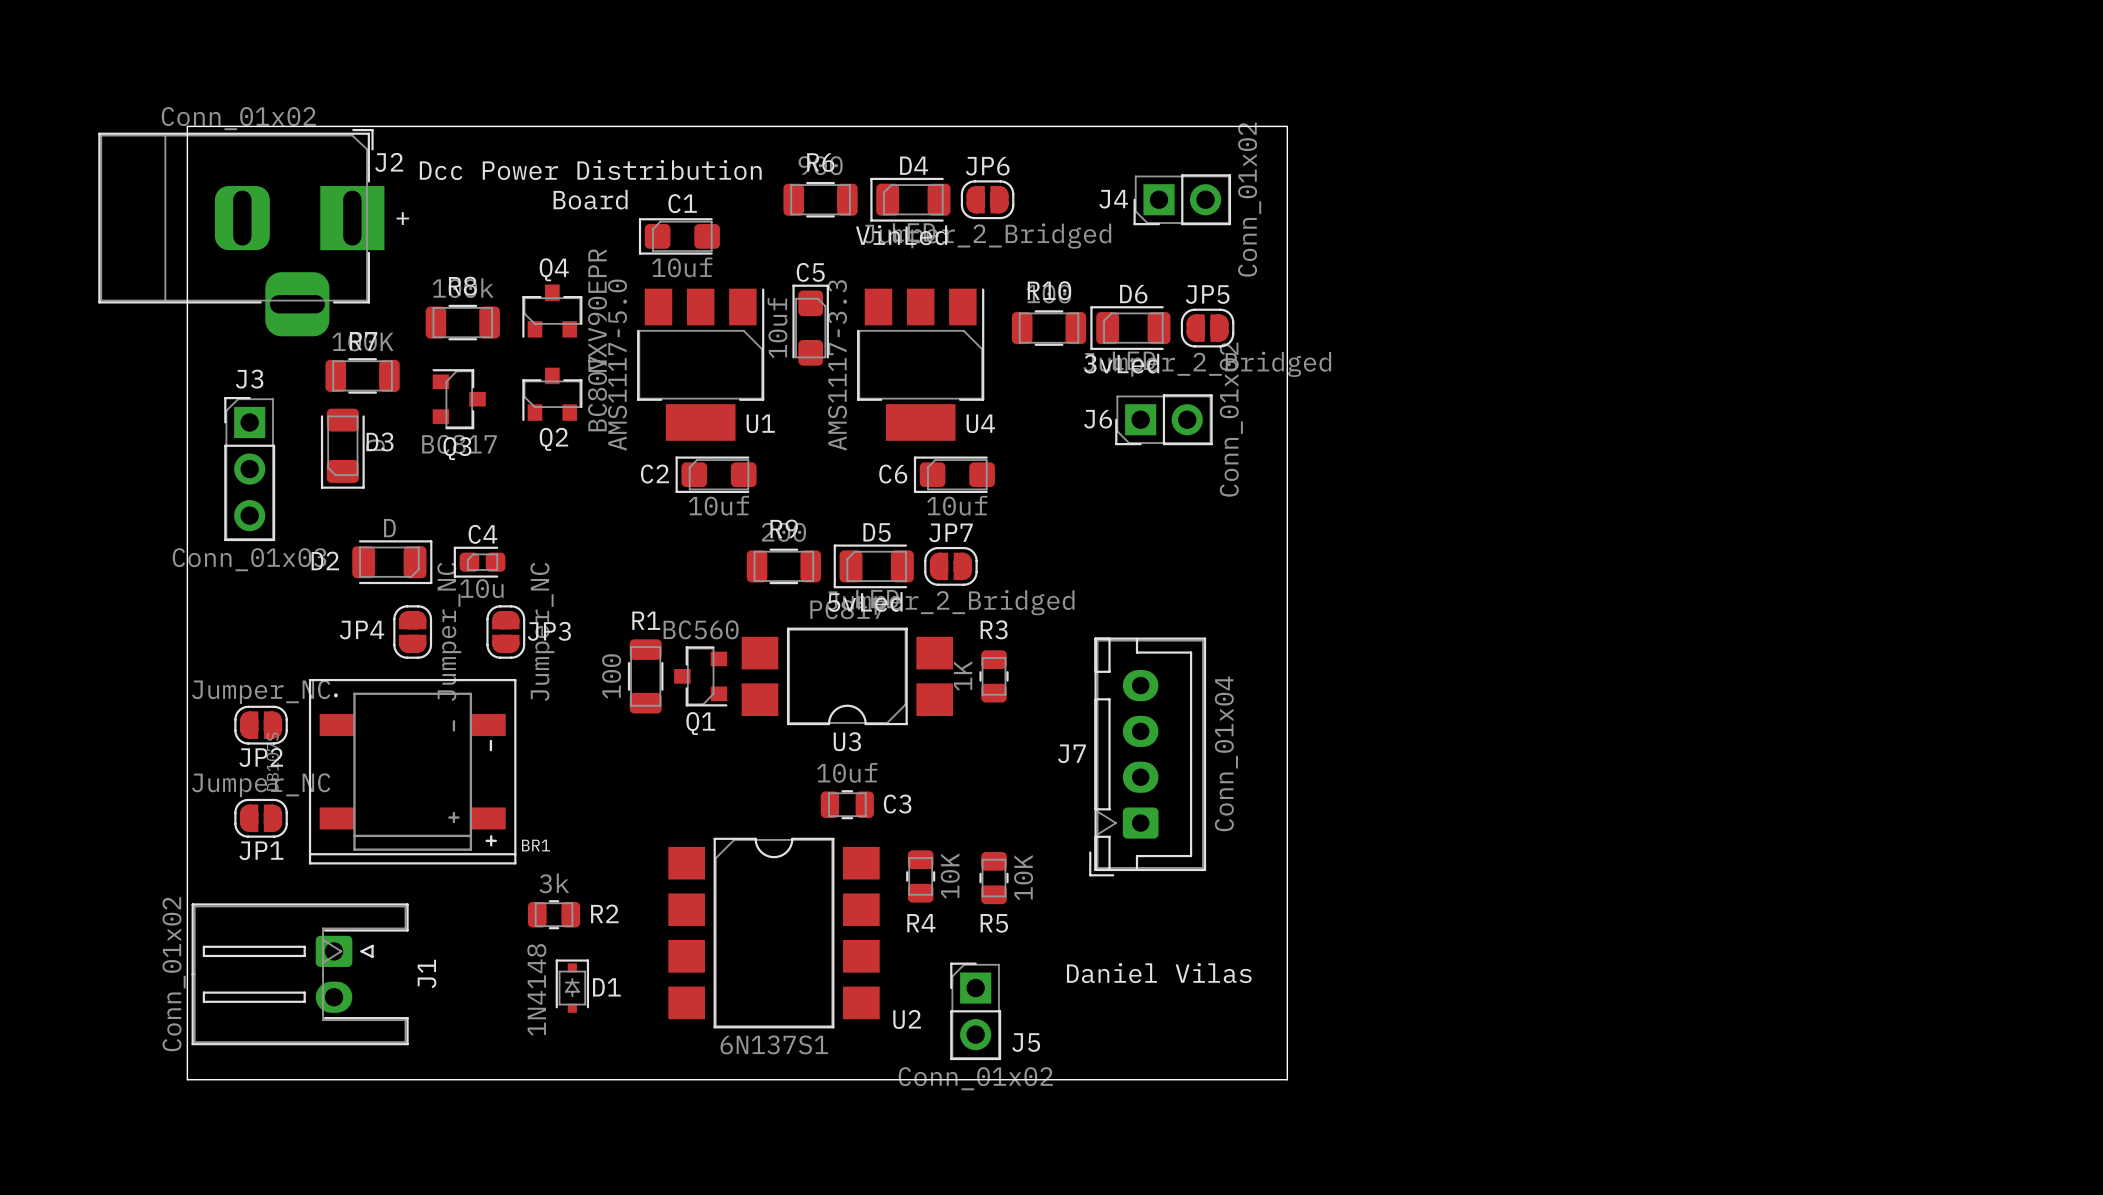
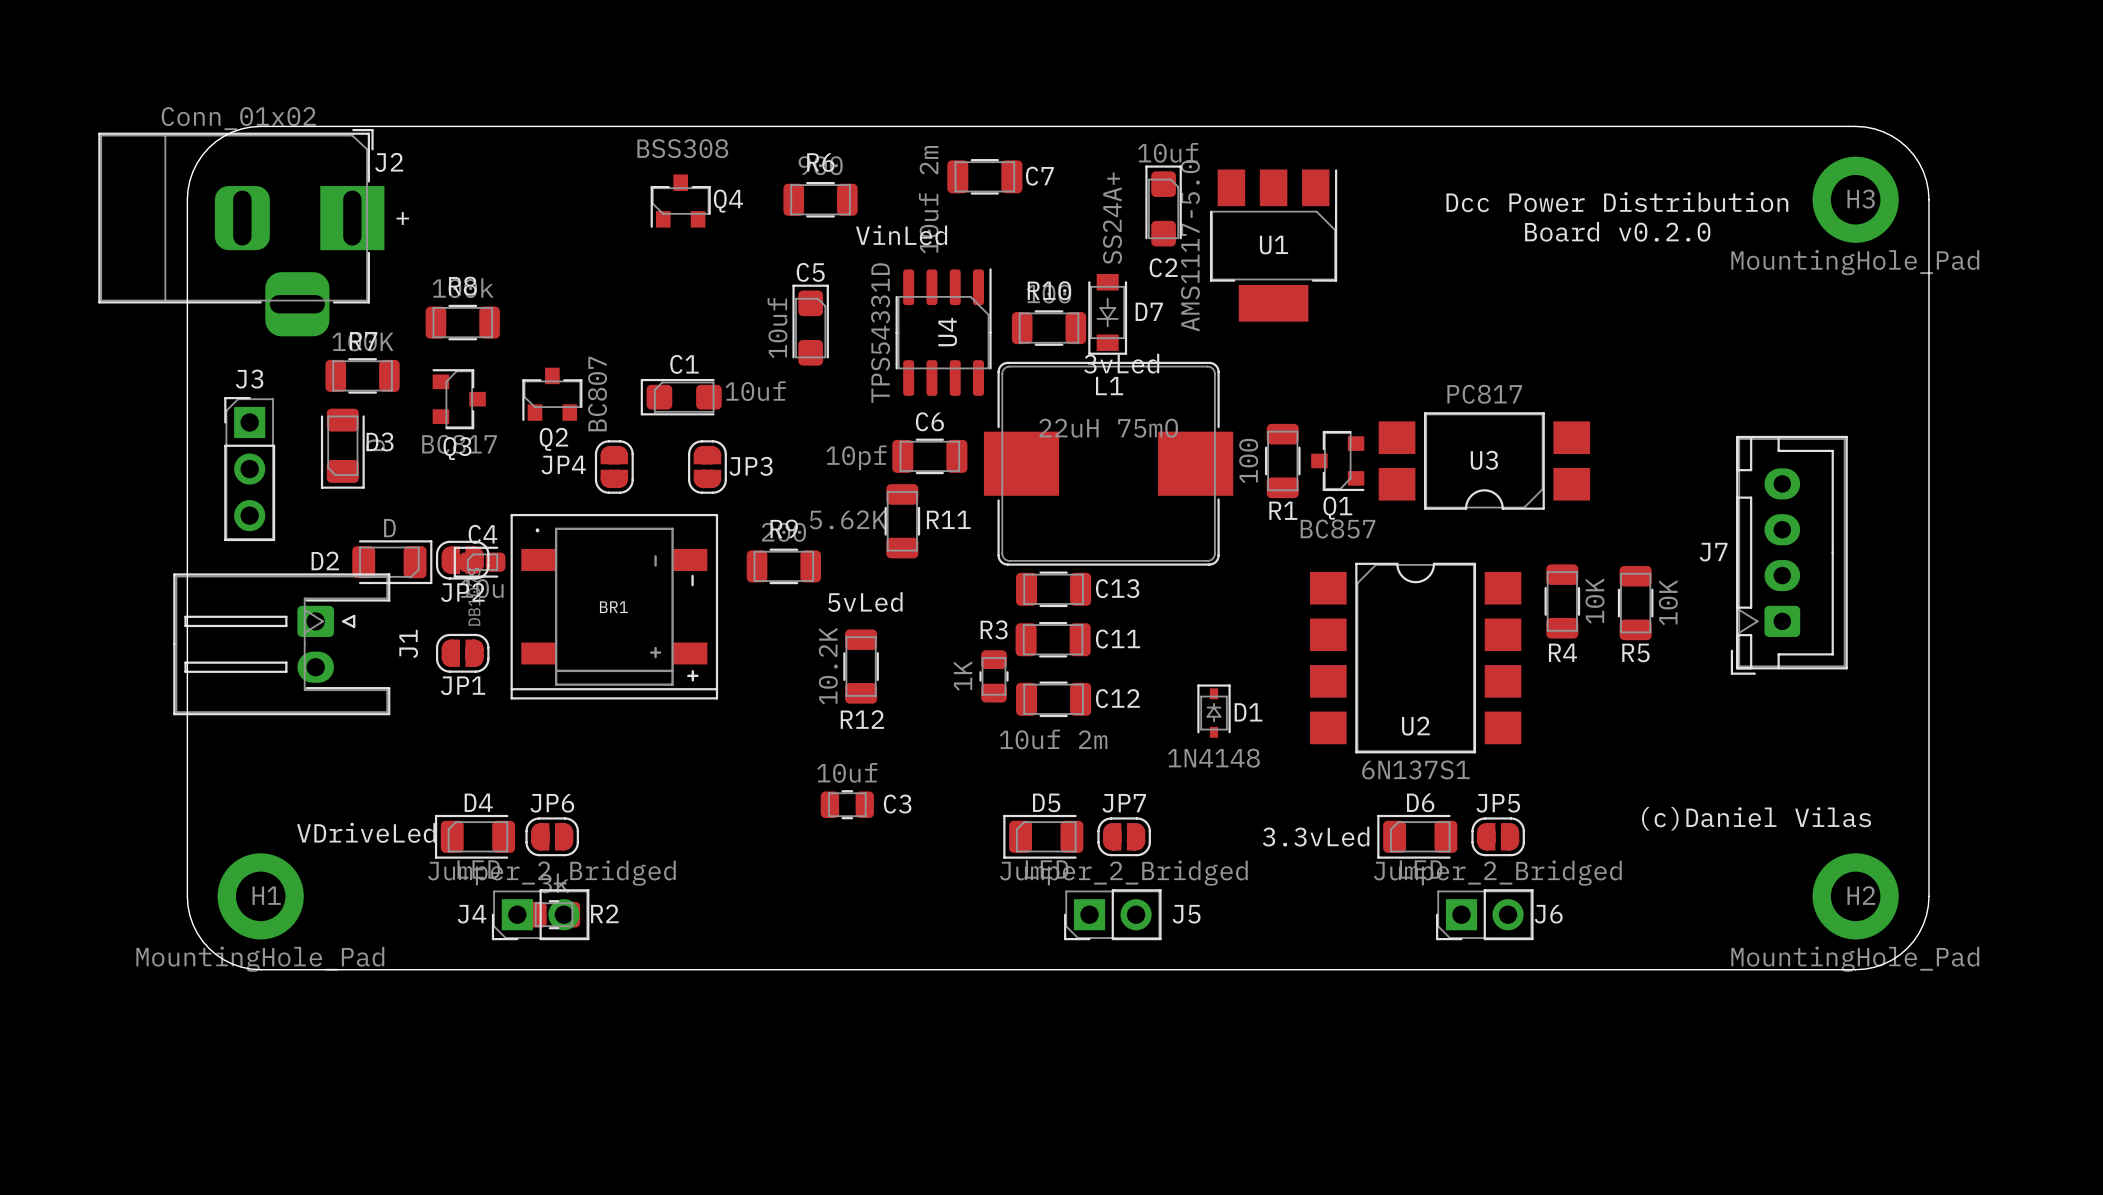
board edge: (260, 126) (187, 126) (187, 199) -> (260, 126) (232, 131) (208, 147) (192, 171) (187, 199)
board edge: (1287, 126) (1287, 1079) (187, 1079) (187, 896) -> (1287, 126) (1855, 126) (1883, 131) (1900, 141) (1913, 155) (1926, 180) (1928, 199) (1928, 896) (1923, 924) (1913, 941) (1900, 954) (1874, 967) (1855, 969) (260, 969) (232, 964) (208, 948) (192, 924) (187, 896)
text: Dcc Power Distribution (590, 170) -> none
C7: none -> 10uf 2m (984, 176)
text: Board (590, 199) -> none
D4 position: (910, 199) -> (475, 836)
JP6 position: (987, 199) -> (552, 836)
J4 position: (1182, 199) -> (540, 914)
J4 value: Conn_01x02 (1249, 199) -> none
H3: none -> MountingHole_Pad (1855, 199)
text: none -> Dcc Power Distribution (1617, 202)
text: none -> Board v0.2.0 (1617, 231)
C1 position: (679, 236) -> (681, 397)
C1 value position: 10uf (682, 267) -> 10uf (755, 391)
Q4 name position: Q4 (554, 269) -> Q4 (728, 201)
U4 footprint: [857, 288, 985, 441] -> [895, 268, 992, 396]
Q4 value: NXV90EPR (597, 310) -> BSS308 (682, 148)
Q4 position: (552, 311) -> (680, 201)
D7: none -> SS24A+ (1107, 314)
D6 position: (1130, 328) -> (1417, 836)
JP5 position: (1207, 328) -> (1498, 836)
U1 position: (700, 364) -> (1273, 245)
U4 value: AMS1117-3.3 (837, 365) -> TPS54331D (880, 333)
J6 name position: J6 (1098, 419) -> J6 (1548, 914)
J6 position: (1163, 419) -> (1484, 914)
J6 value: Conn_01x02 (1231, 419) -> none
U1 name position: U1 (760, 423) -> U1 (1274, 245)
U4 name position: U4 (980, 423) -> U4 (947, 332)
C6 footprint: [913, 456, 995, 493] -> [892, 438, 968, 475]
L1: none -> 22uH 75mO (1108, 463)
C2 name position: C2 (654, 474) -> C2 (1163, 267)
C2 rotation: 0° (716, 474) -> 90° clockwise (1163, 205)
C2 position: (716, 474) -> (1163, 205)
C6 name position: C6 (893, 474) -> C6 (929, 421)
C2 value position: 10uf (718, 505) -> 10uf (1168, 152)
C6 value: 10uf (957, 505) -> 10pf (856, 457)
R11: none -> 5.62K (902, 521)
J3 value: Conn_01x03 (249, 559) -> none
D5 position: (873, 566) -> (1043, 836)
JP7 position: (950, 566) -> (1124, 836)
C13: none -> 10uf 2m (1053, 589)
R1 name position: R1 (646, 620) -> R1 (1283, 510)
Q1 value: BC560 (701, 629) -> BC857 (1337, 529)
JP4 value: Jumper_NC (449, 631) -> none
JP3 value: Jumper_NC (542, 631) -> none
JP4 position: (412, 632) -> (614, 467)
JP3 position: (505, 632) -> (707, 467)
C11: none -> (1053, 639)
R12: none -> 10.2K (861, 666)
R1 position: (645, 676) -> (1282, 460)
Q1 position: (700, 676) -> (1337, 460)
U3 position: (847, 676) -> (1484, 460)
JP2 value: Jumper_NC (261, 692) -> none
C12: none -> (1053, 699)
JP2 position: (261, 725) -> (462, 560)
U3 name position: U3 (847, 741) -> U3 (1484, 460)
J7 value: Conn_01x04 (1226, 753) -> none
J7 position: (1147, 756) -> (1789, 555)
BR1 position: (412, 771) -> (614, 606)
JP1 value: Jumper_NC (261, 785) -> none
JP1 position: (261, 818) -> (462, 653)
text: none -> (c)Daniel Vilas (1756, 818)
text: none -> VDriveLed (366, 832)
text: none -> 3.3vLed (1316, 836)
BR1 name position: BR1 (536, 845) -> BR1 (613, 607)
R4 footprint: [906, 850, 936, 903] -> [1544, 564, 1581, 639]
R5 footprint: [979, 851, 1009, 905] -> [1617, 565, 1654, 641]
H1: none -> MountingHole_Pad (260, 896)
H2: none -> MountingHole_Pad (1855, 896)
U2 position: (774, 933) -> (1415, 658)
D1 footprint: [555, 959, 590, 1013] -> [1197, 684, 1231, 738]
text: Daniel Vilas (1159, 973) -> none
J1 value: Conn_01x02 (174, 974) -> none
J1 position: (300, 974) -> (281, 644)
D1 value position: 1N4148 (536, 989) -> 1N4148 (1213, 758)
J5 rotation: 0° (975, 1011) -> 90° counterclockwise (1112, 914)
J5 position: (975, 1011) -> (1112, 914)
U2 name position: U2 (907, 1019) -> U2 (1415, 726)
J5 name position: J5 (1026, 1042) -> J5 (1186, 914)
J5 value: Conn_01x02 (975, 1078) -> none

